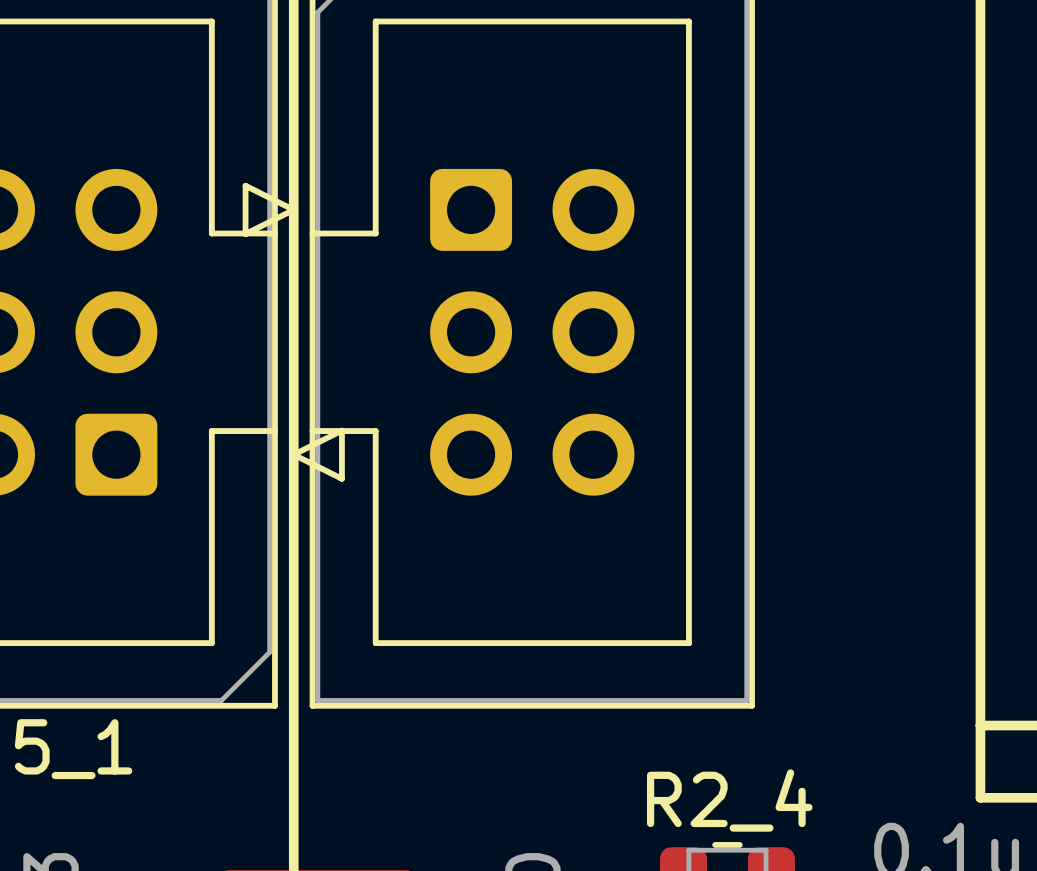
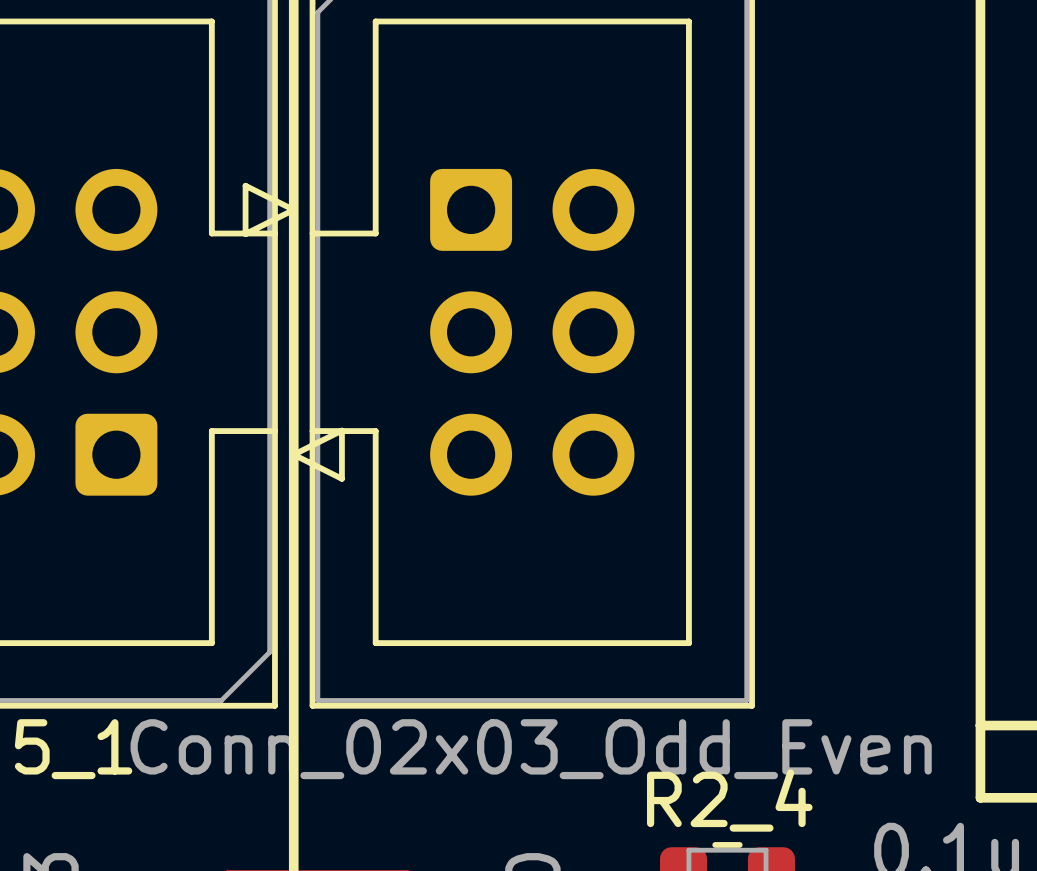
part value: none -> Conn_02x03_Odd_Even (531, 749)

